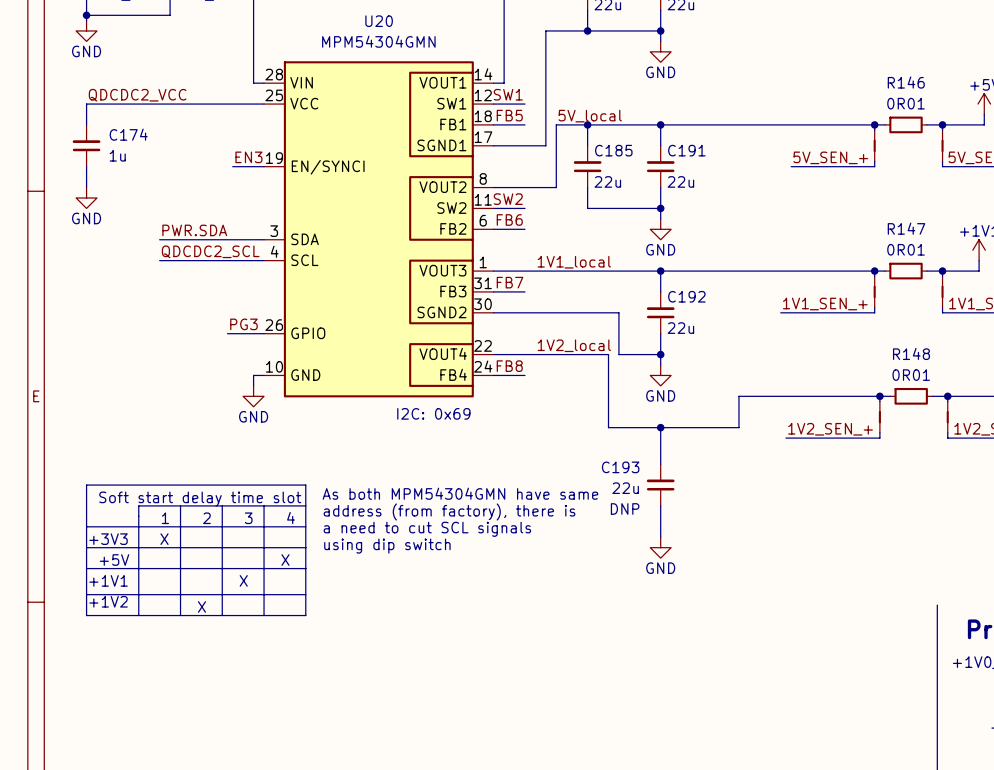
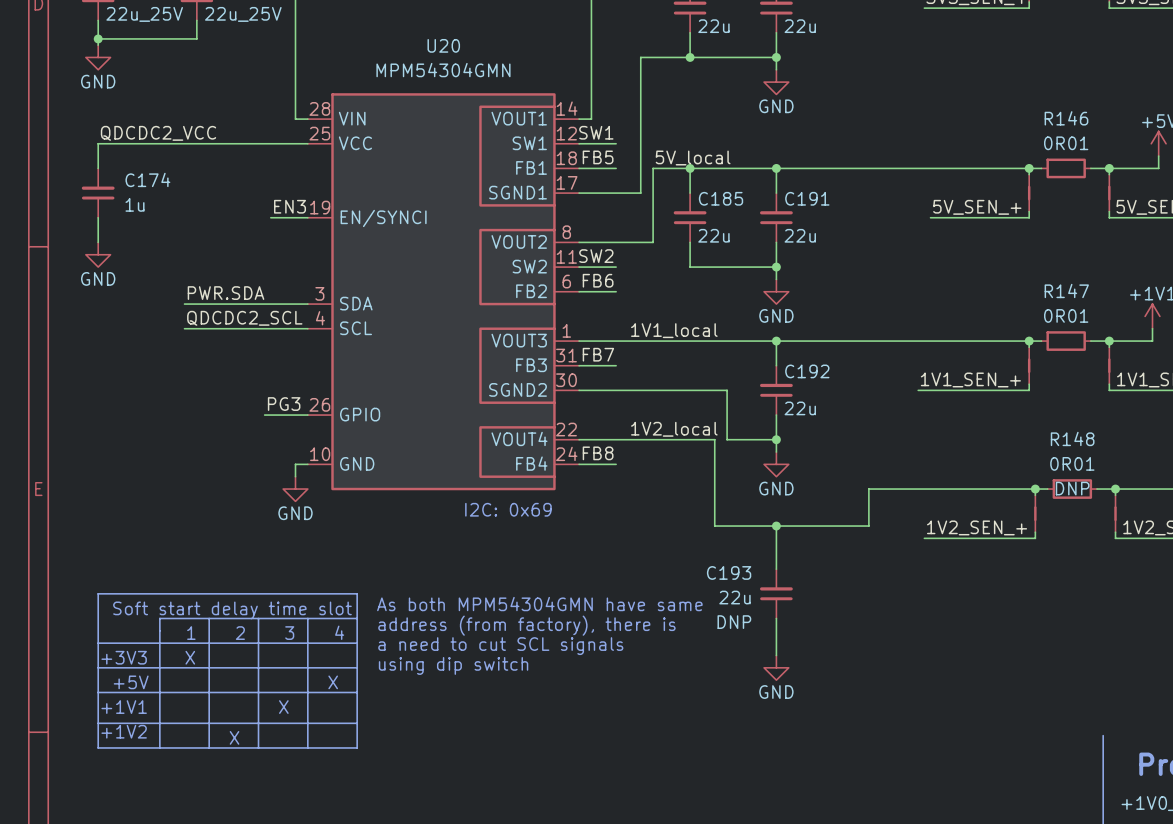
R148 text: none -> DNP (1072, 488)

